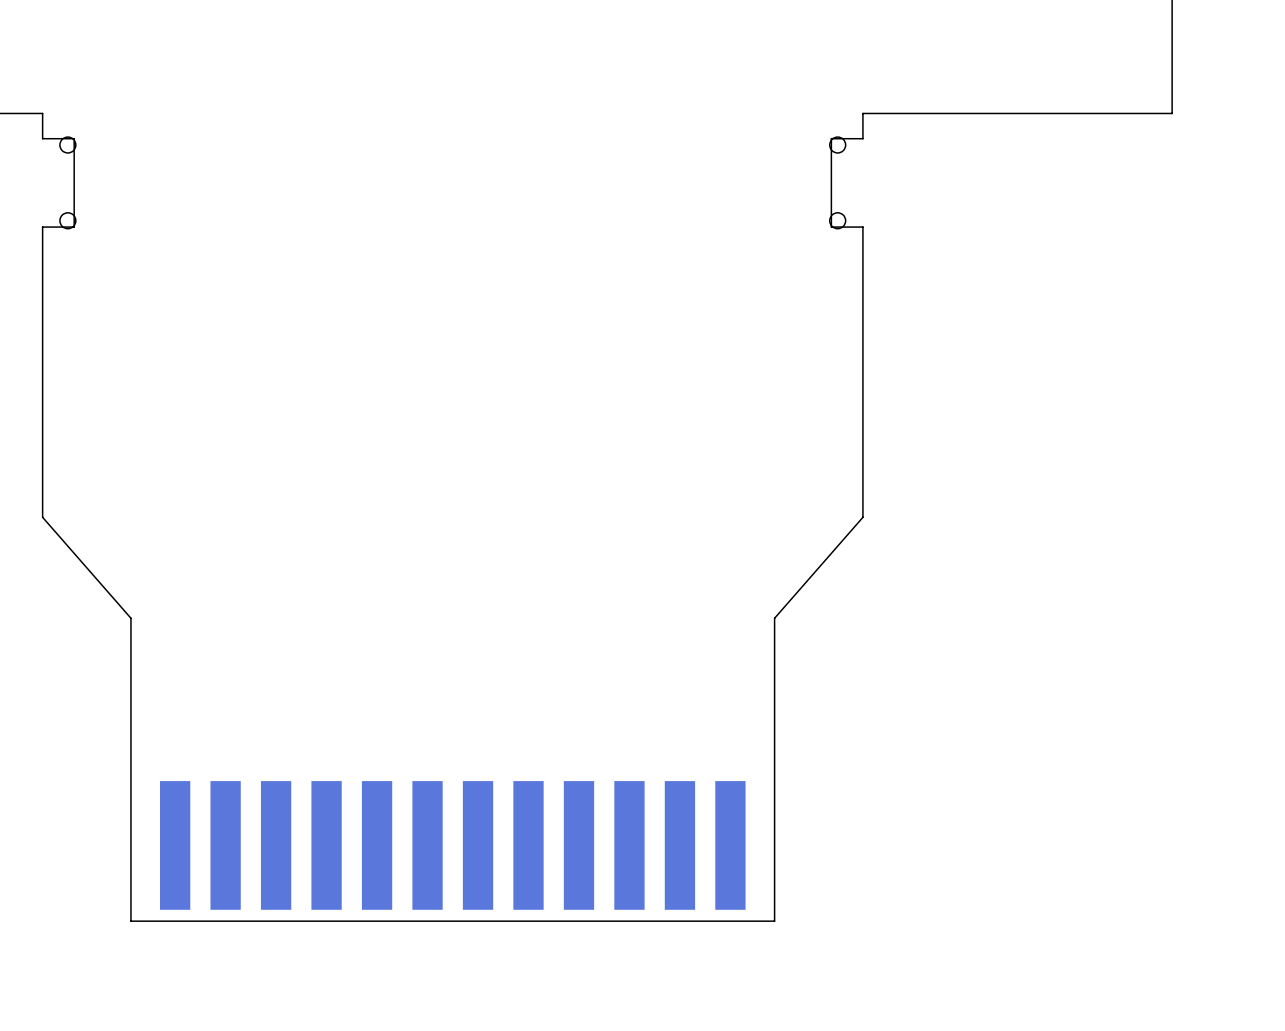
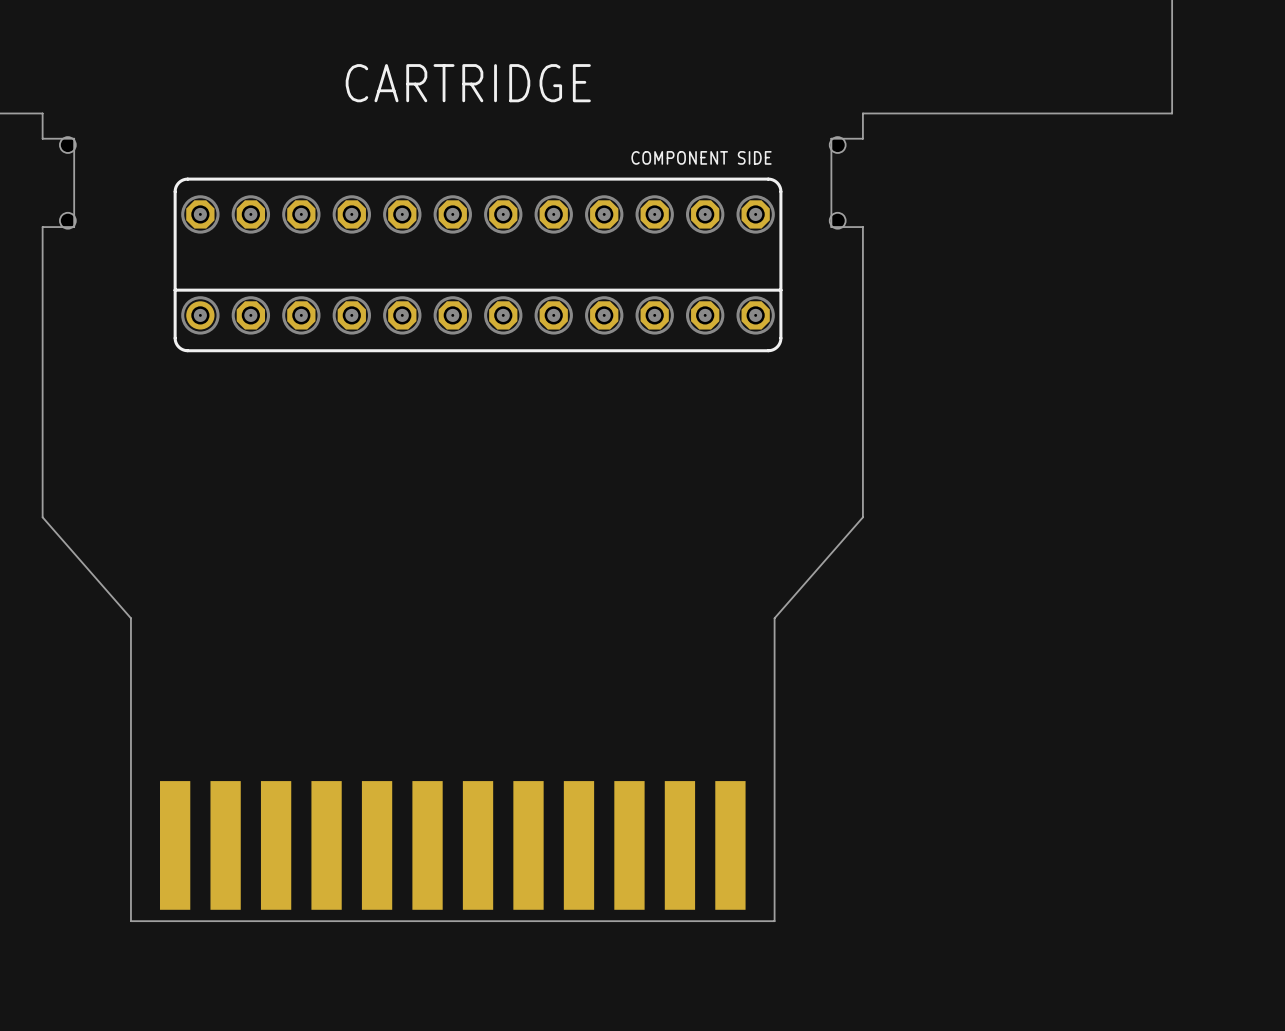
text: none -> CARTRIDGE (468, 83)
part: none -> (478, 264)

